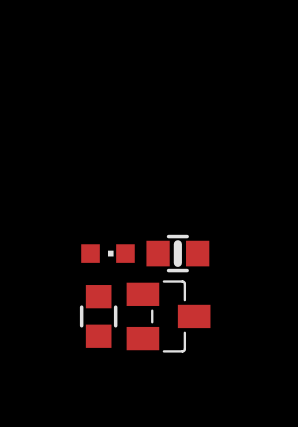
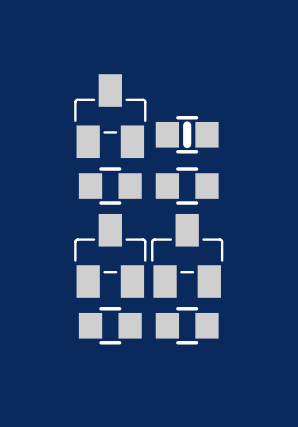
part: none -> (110, 116)
part: none -> (187, 134)
part: none -> (110, 186)
part: none -> (187, 186)
part footprint: [146, 234, 210, 273] -> [151, 213, 224, 298]
part footprint: [81, 244, 135, 263] -> [74, 213, 147, 298]
part footprint: [126, 280, 211, 353] -> [155, 307, 219, 345]
part rotation: 0° (98, 316) -> 90° clockwise (110, 325)

